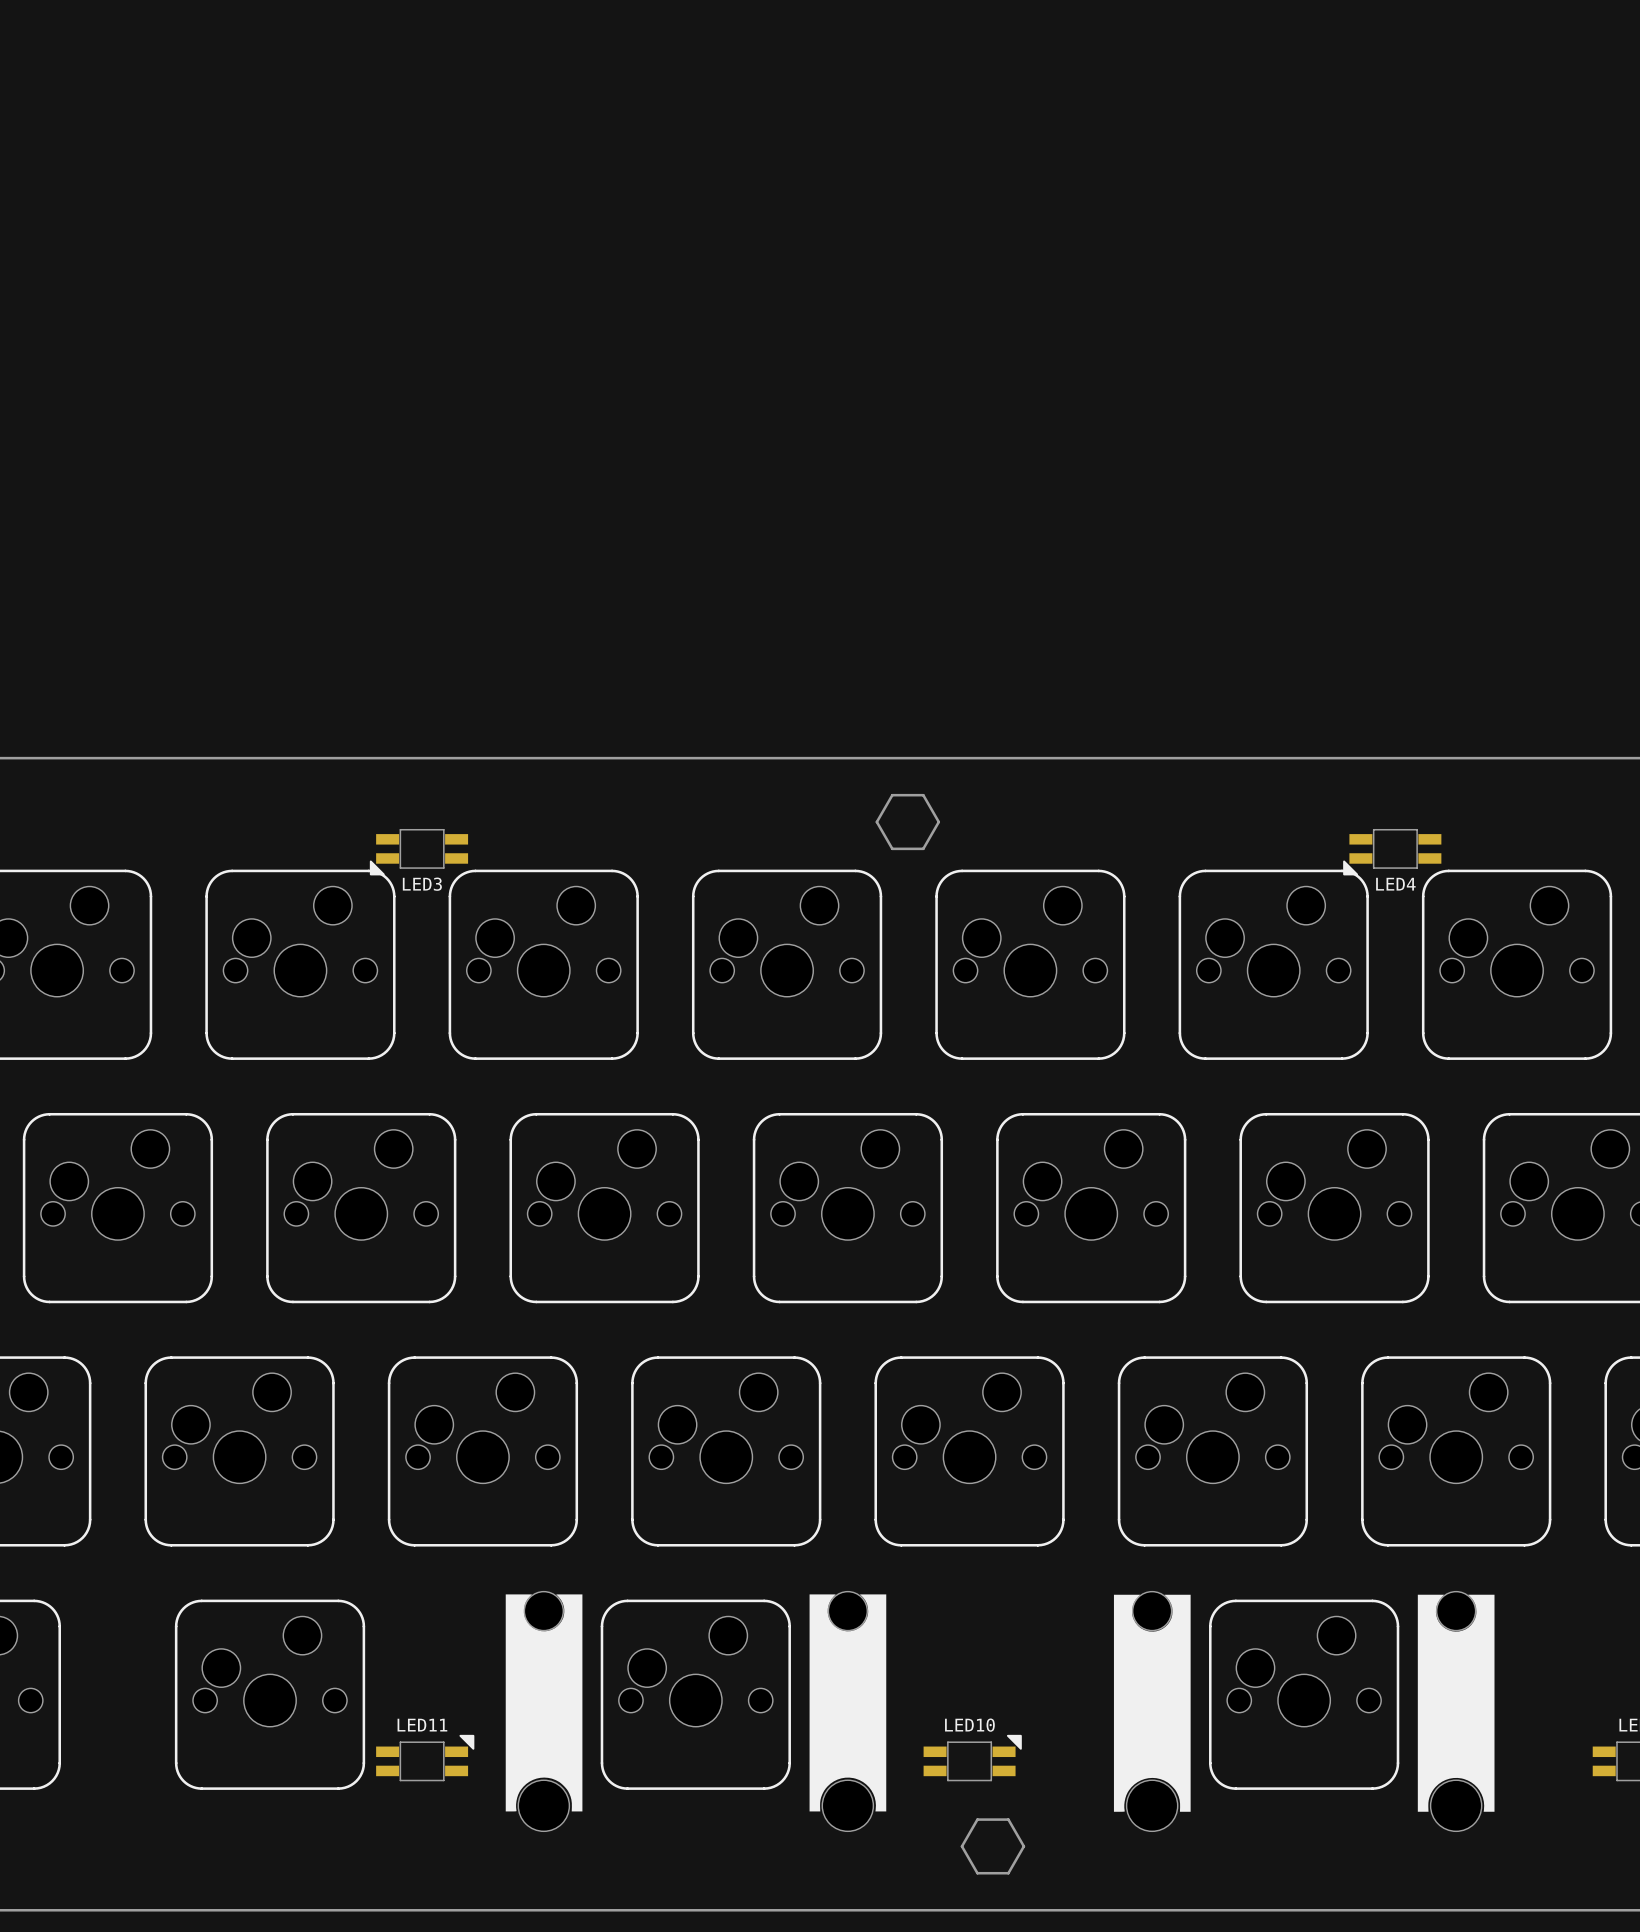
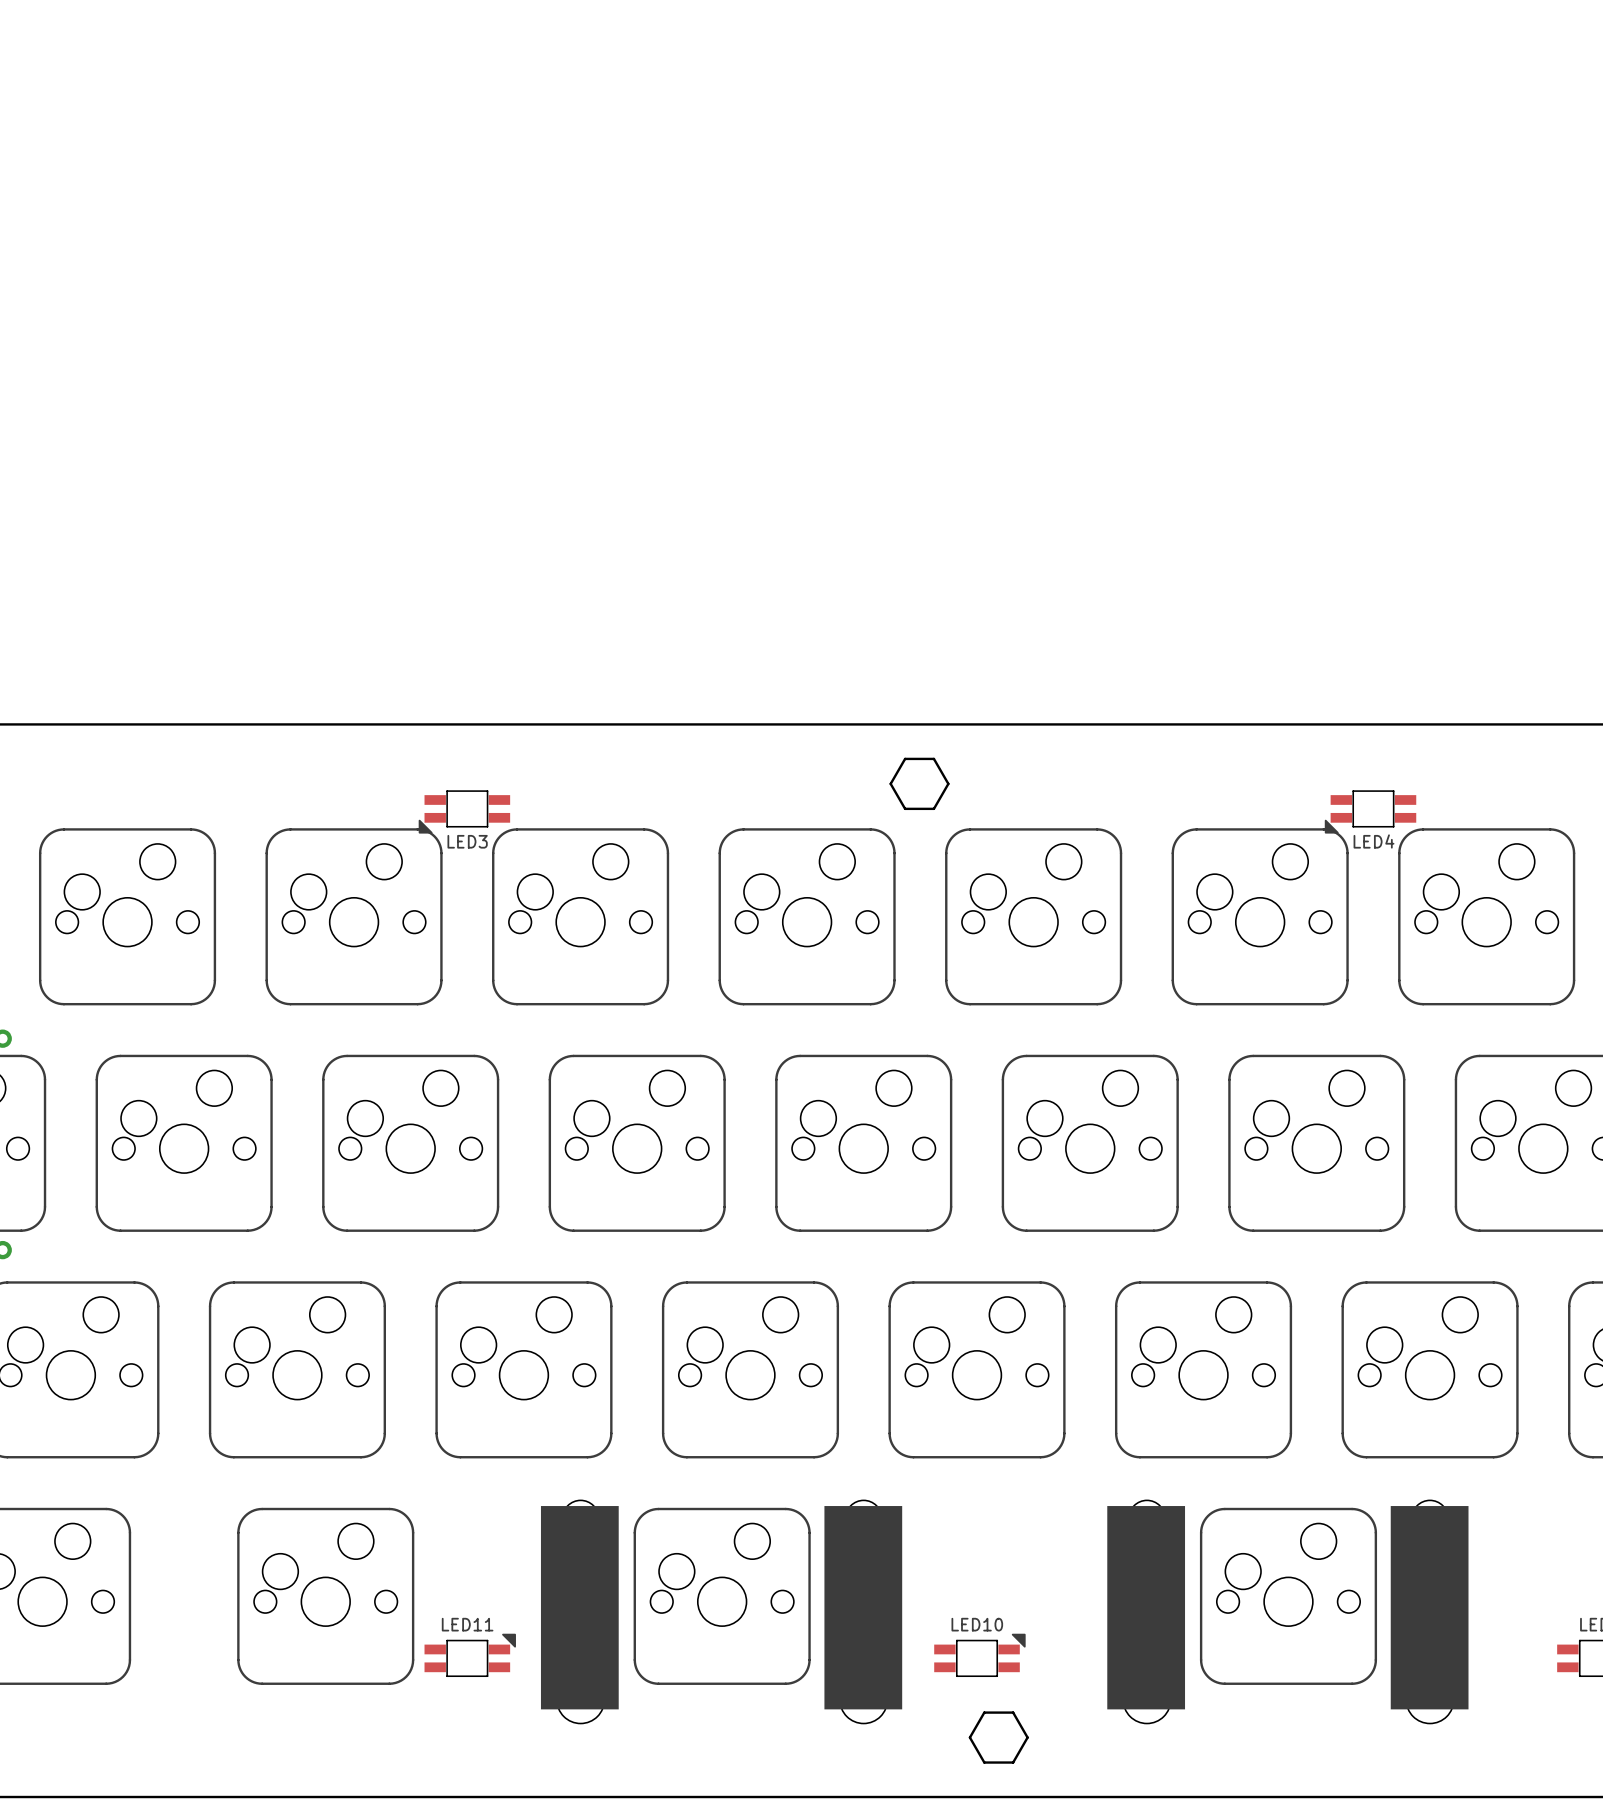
part footprint: [505, 1591, 887, 1832] -> [540, 1500, 903, 1724]
part footprint: [1113, 1591, 1495, 1832] -> [1107, 1500, 1469, 1724]

